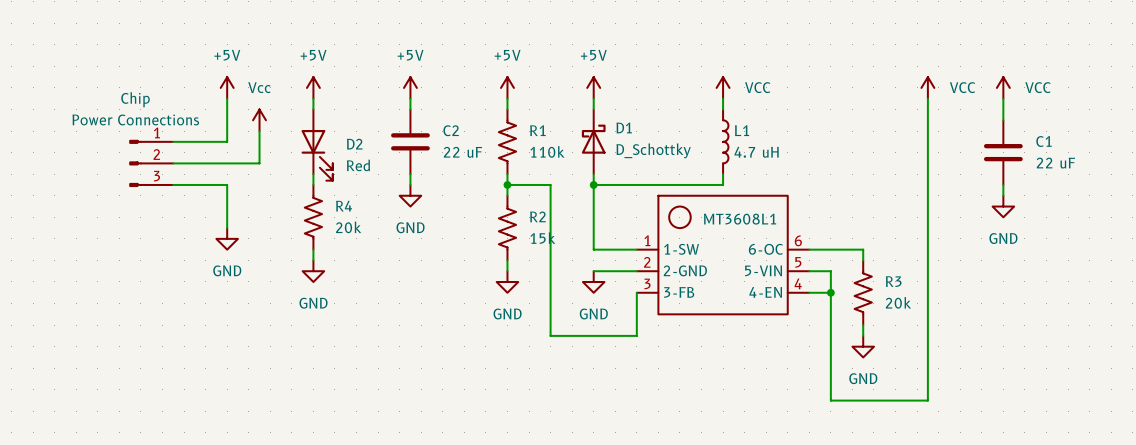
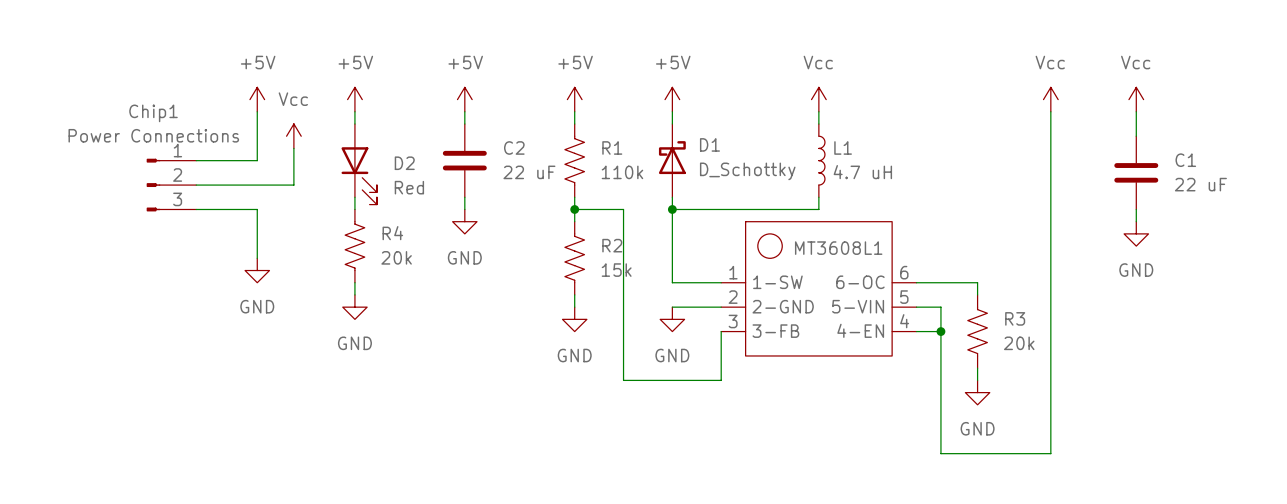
power symbol: VCC (723, 87) -> Vcc (818, 99)
power symbol: VCC (927, 87) -> Vcc (1050, 99)
power symbol: VCC (1003, 87) -> Vcc (1136, 99)
Chip name: Chip (135, 99) -> Chip1 (153, 113)

